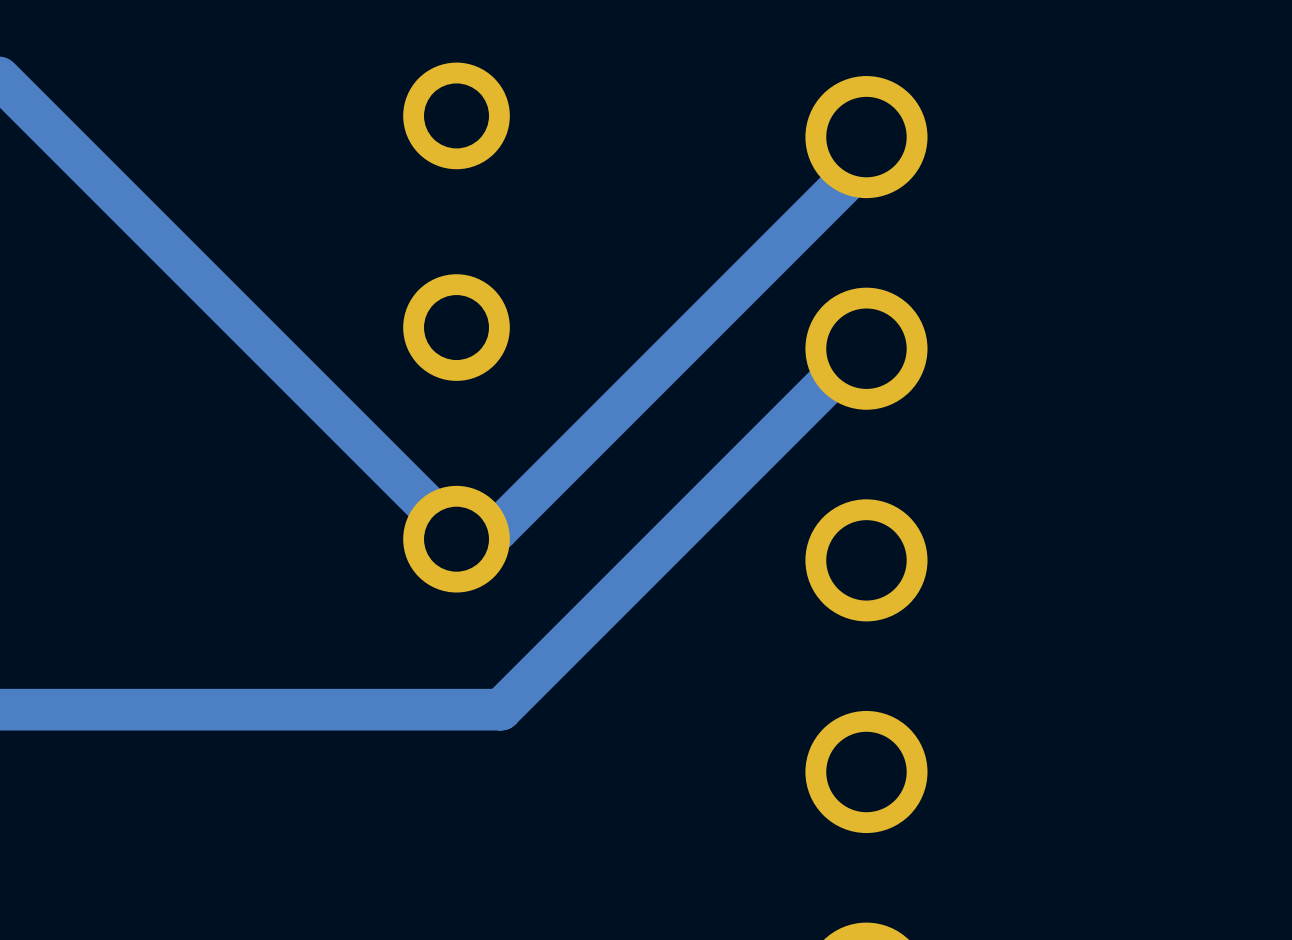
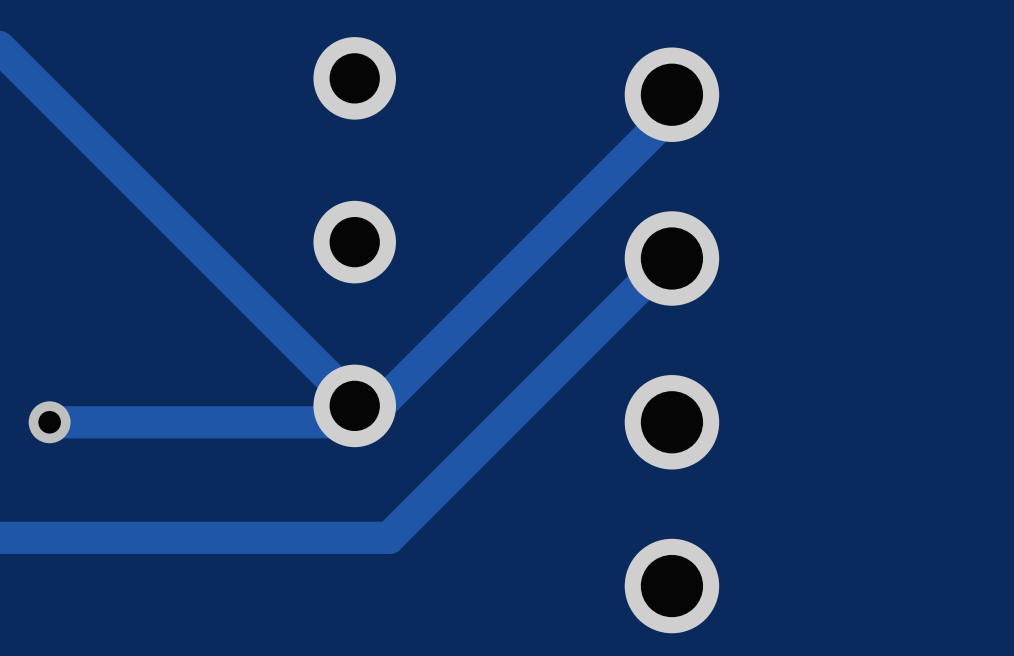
track: none -> (354, 405) (338, 422) (49, 422)
via: none -> (49, 422)

